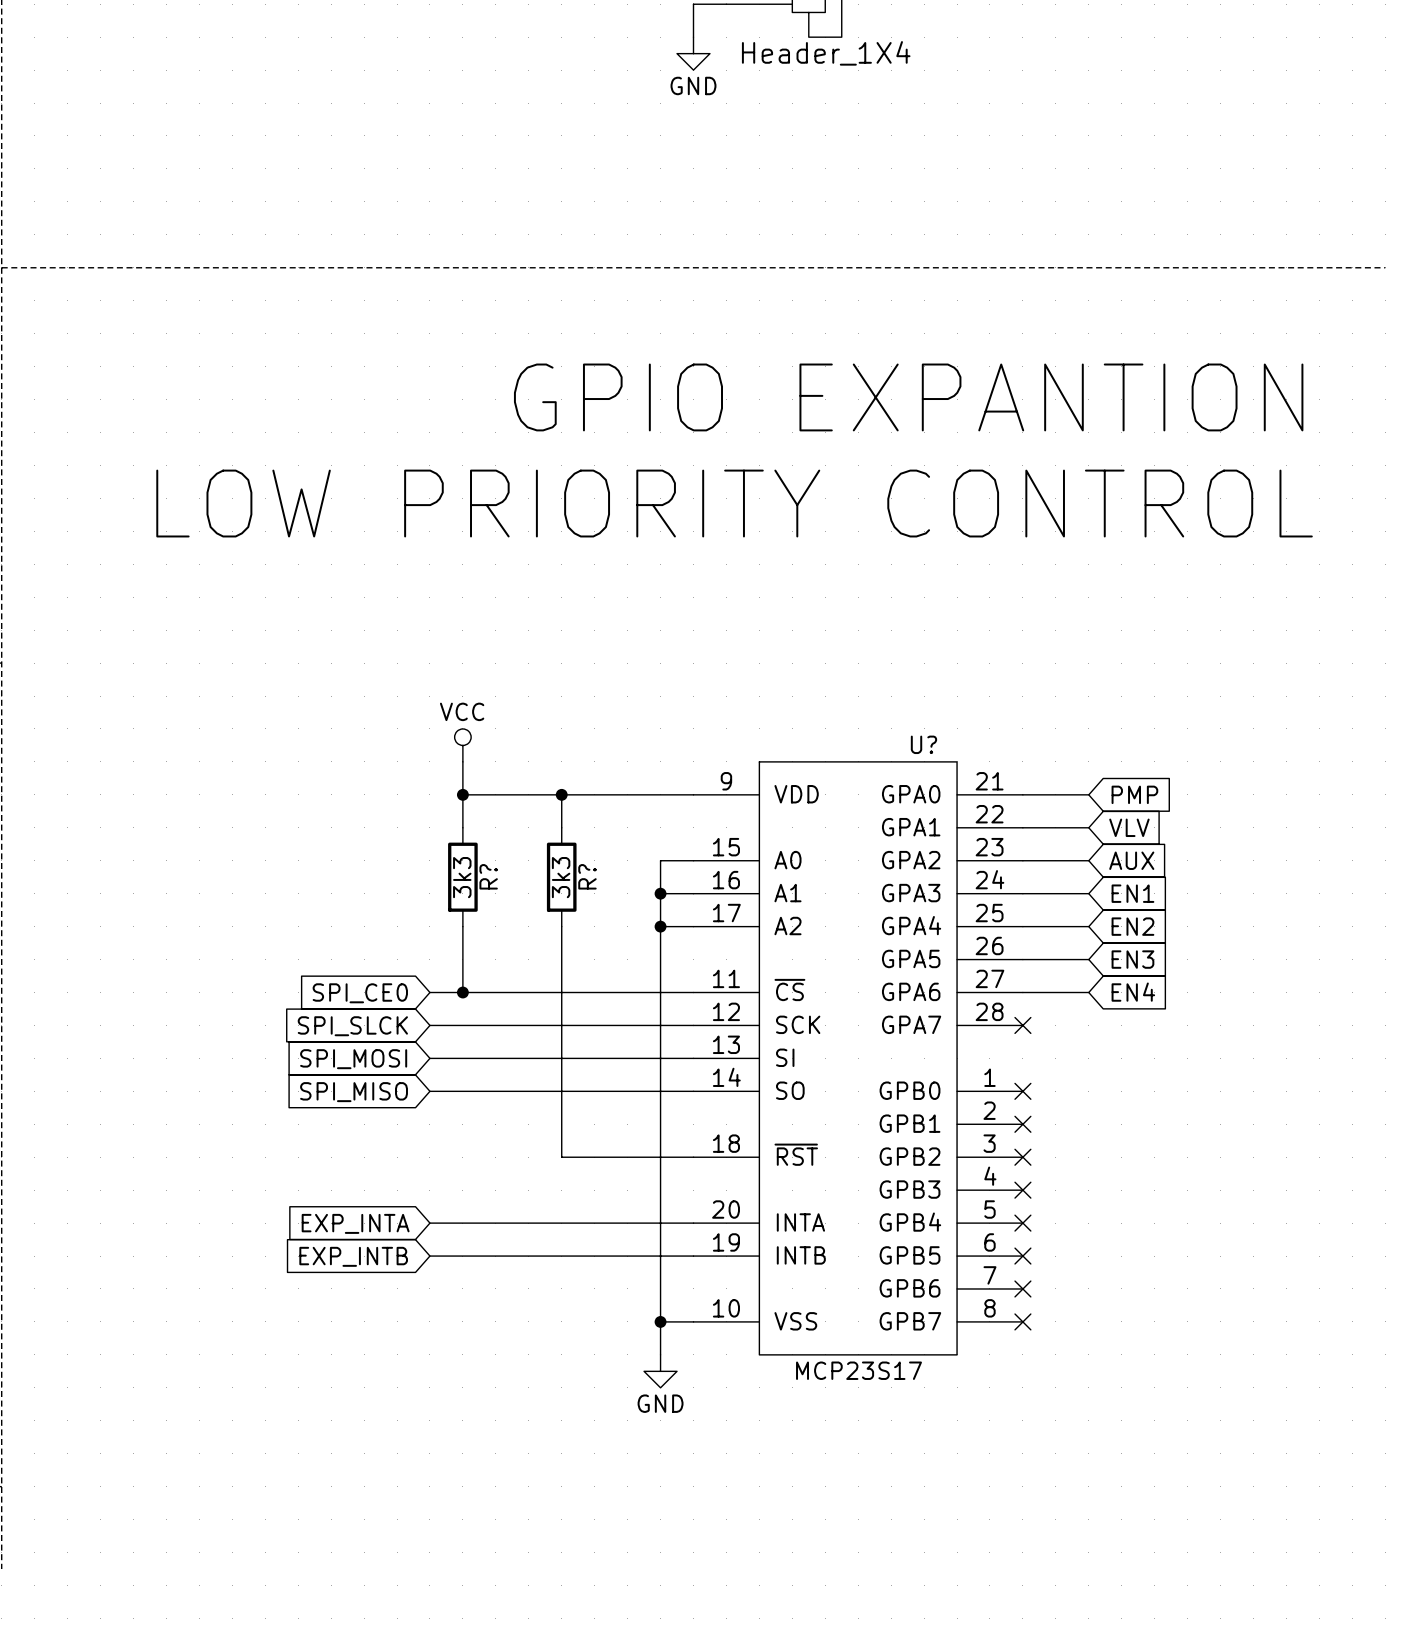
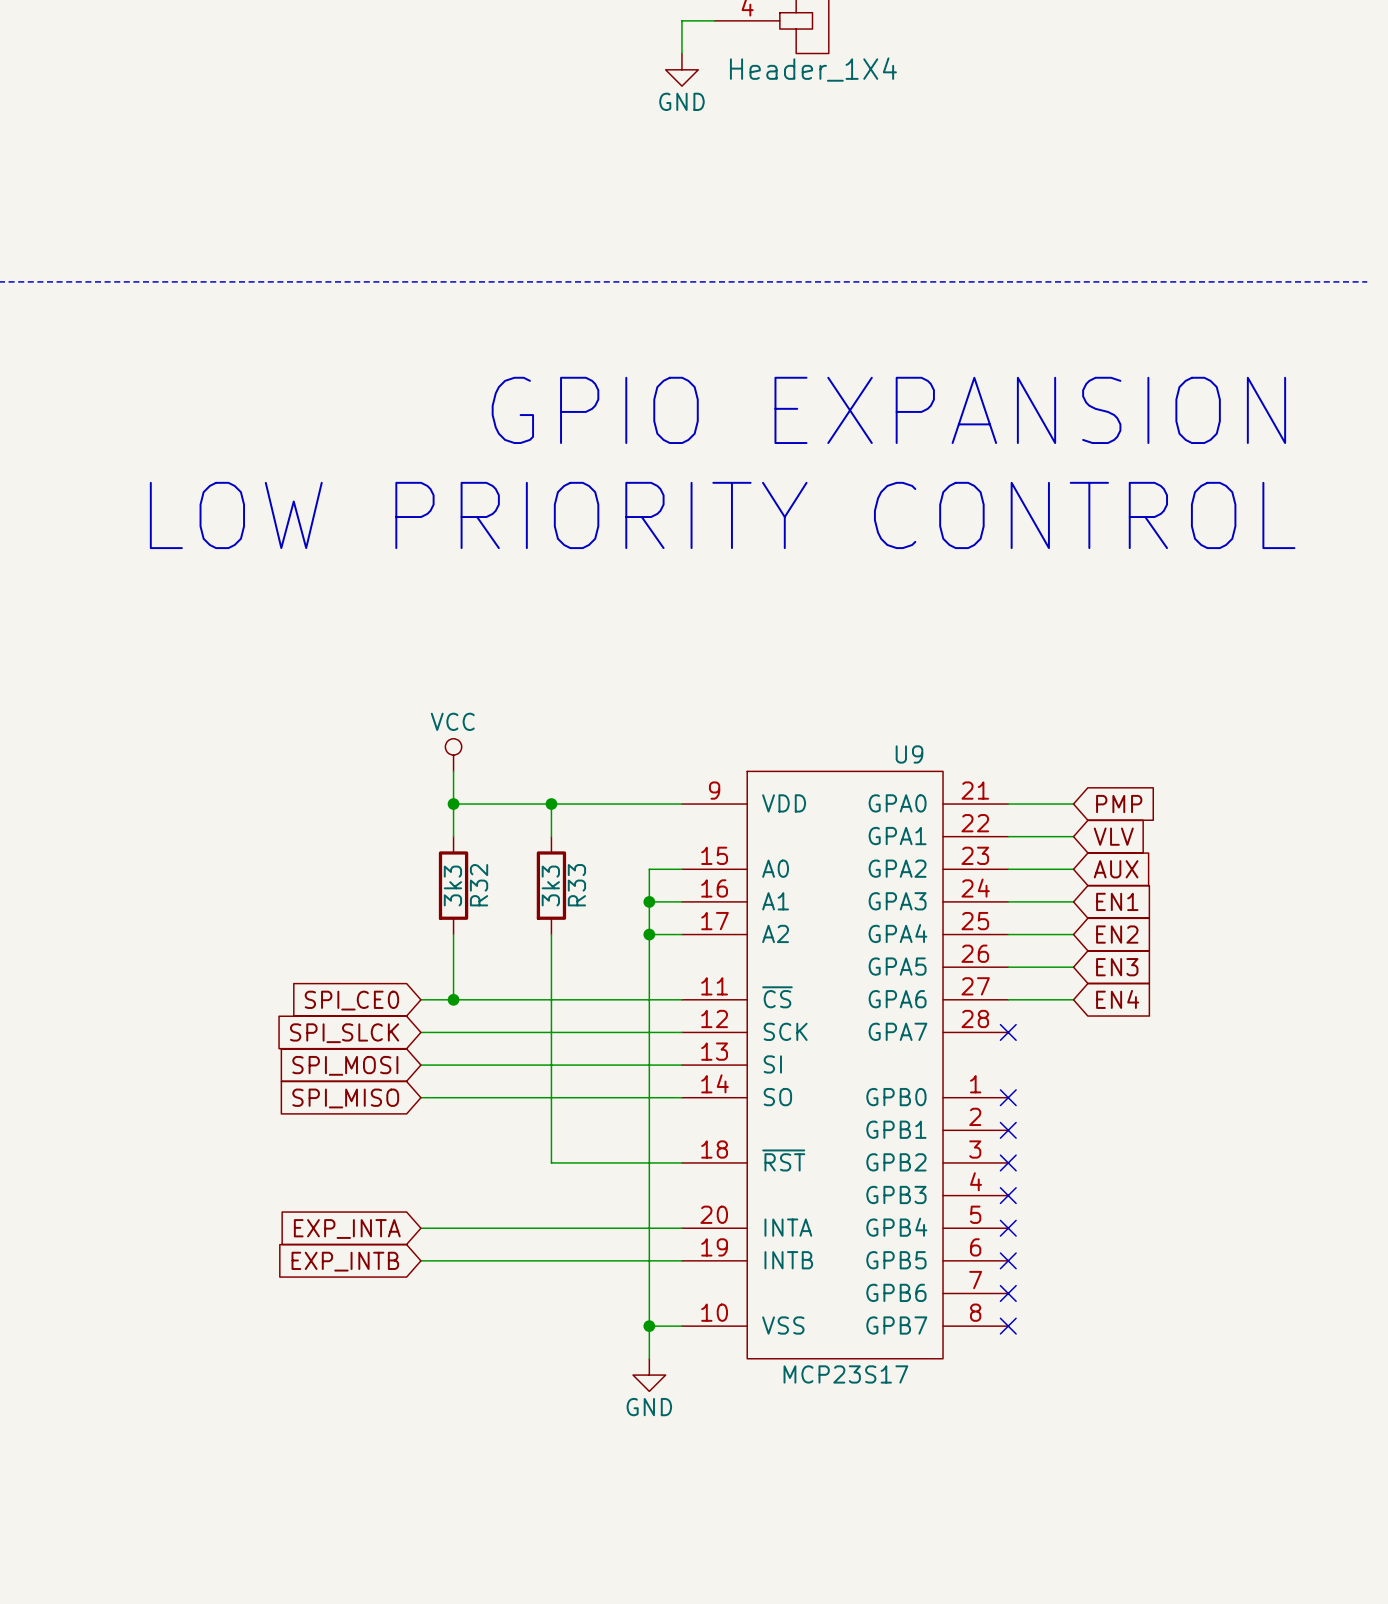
text: GPIO EXPANTION (908, 397) -> GPIO EXPANSION (888, 410)
U? name: U? (923, 744) -> U9 (909, 754)
R? name: R? (488, 876) -> R32 (479, 885)
R? name: R? (587, 876) -> R33 (576, 885)

